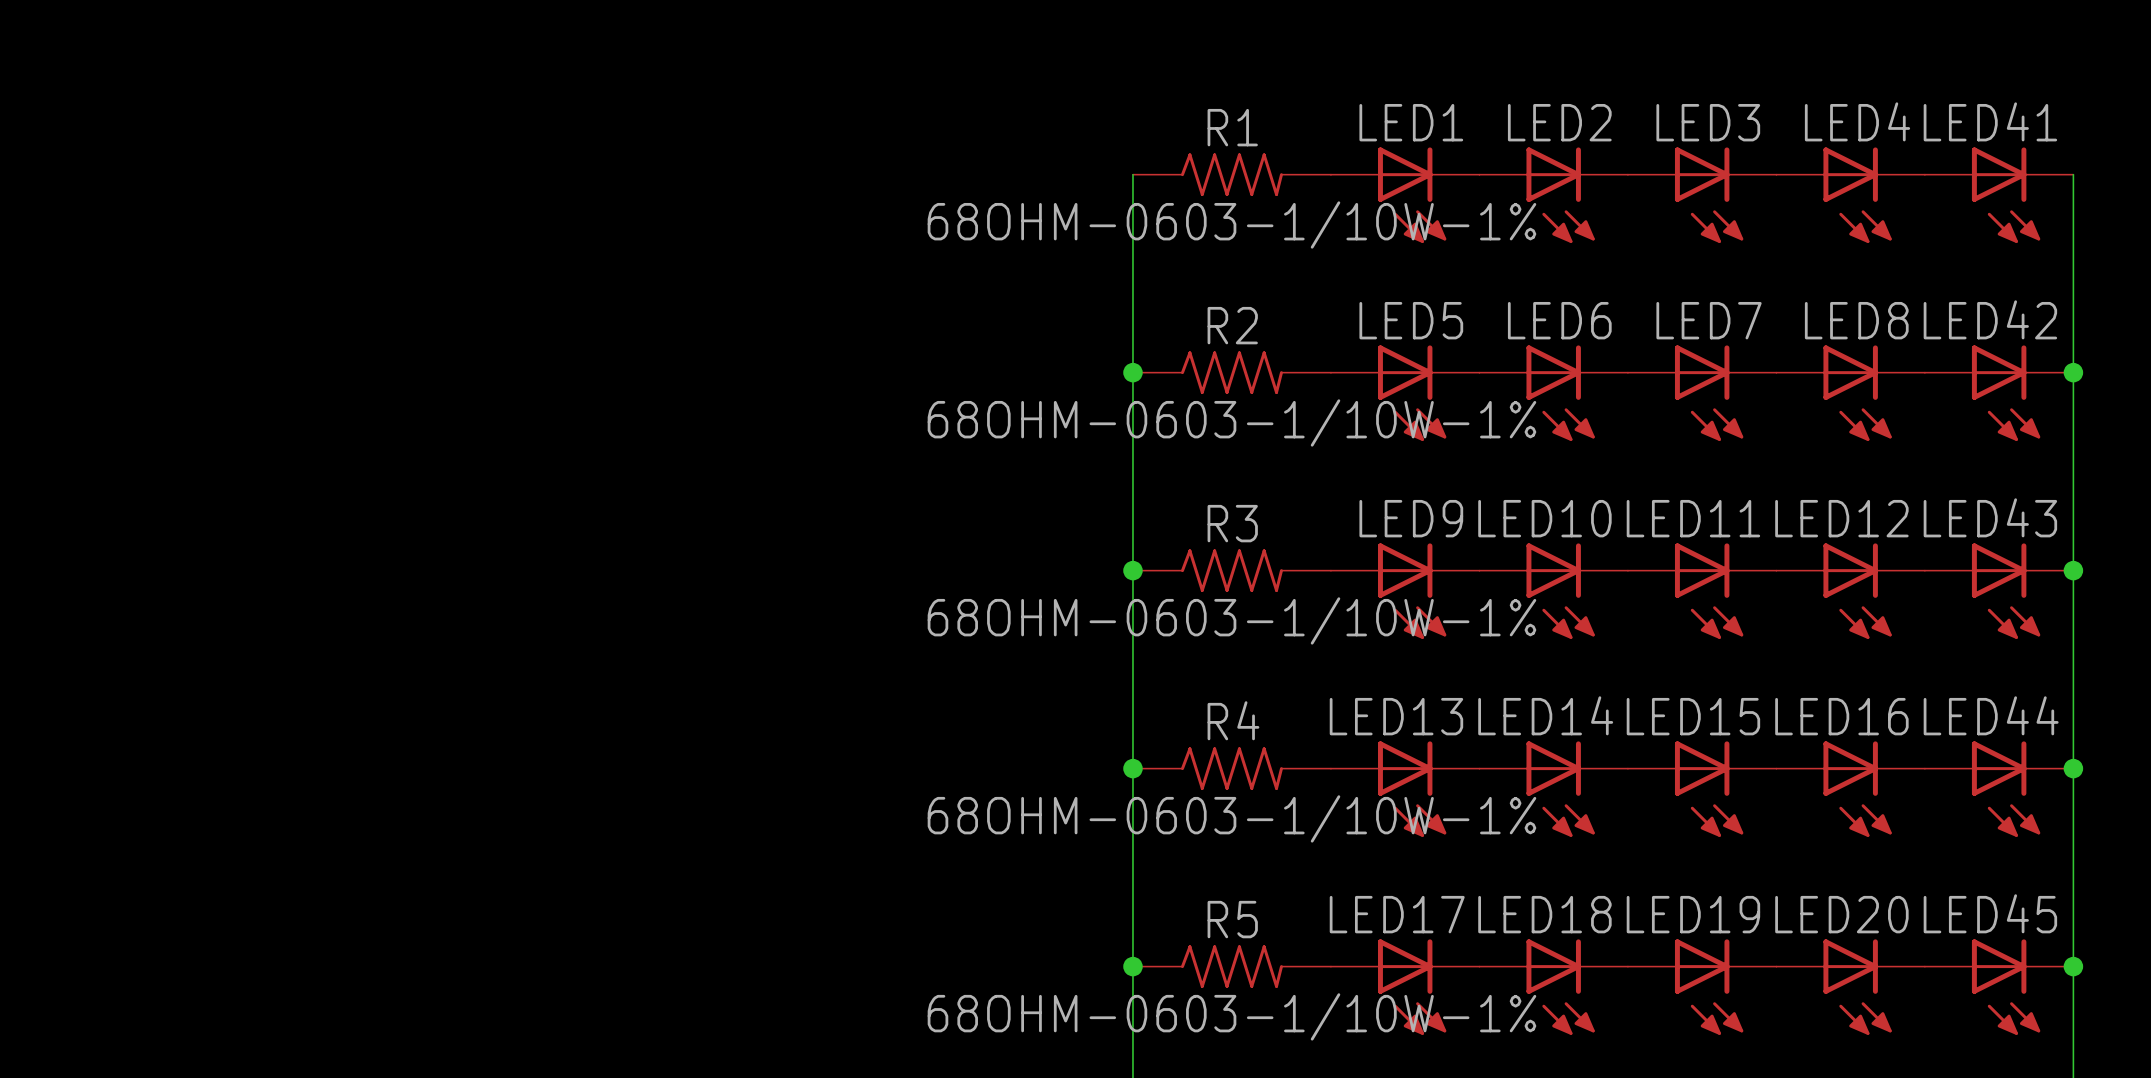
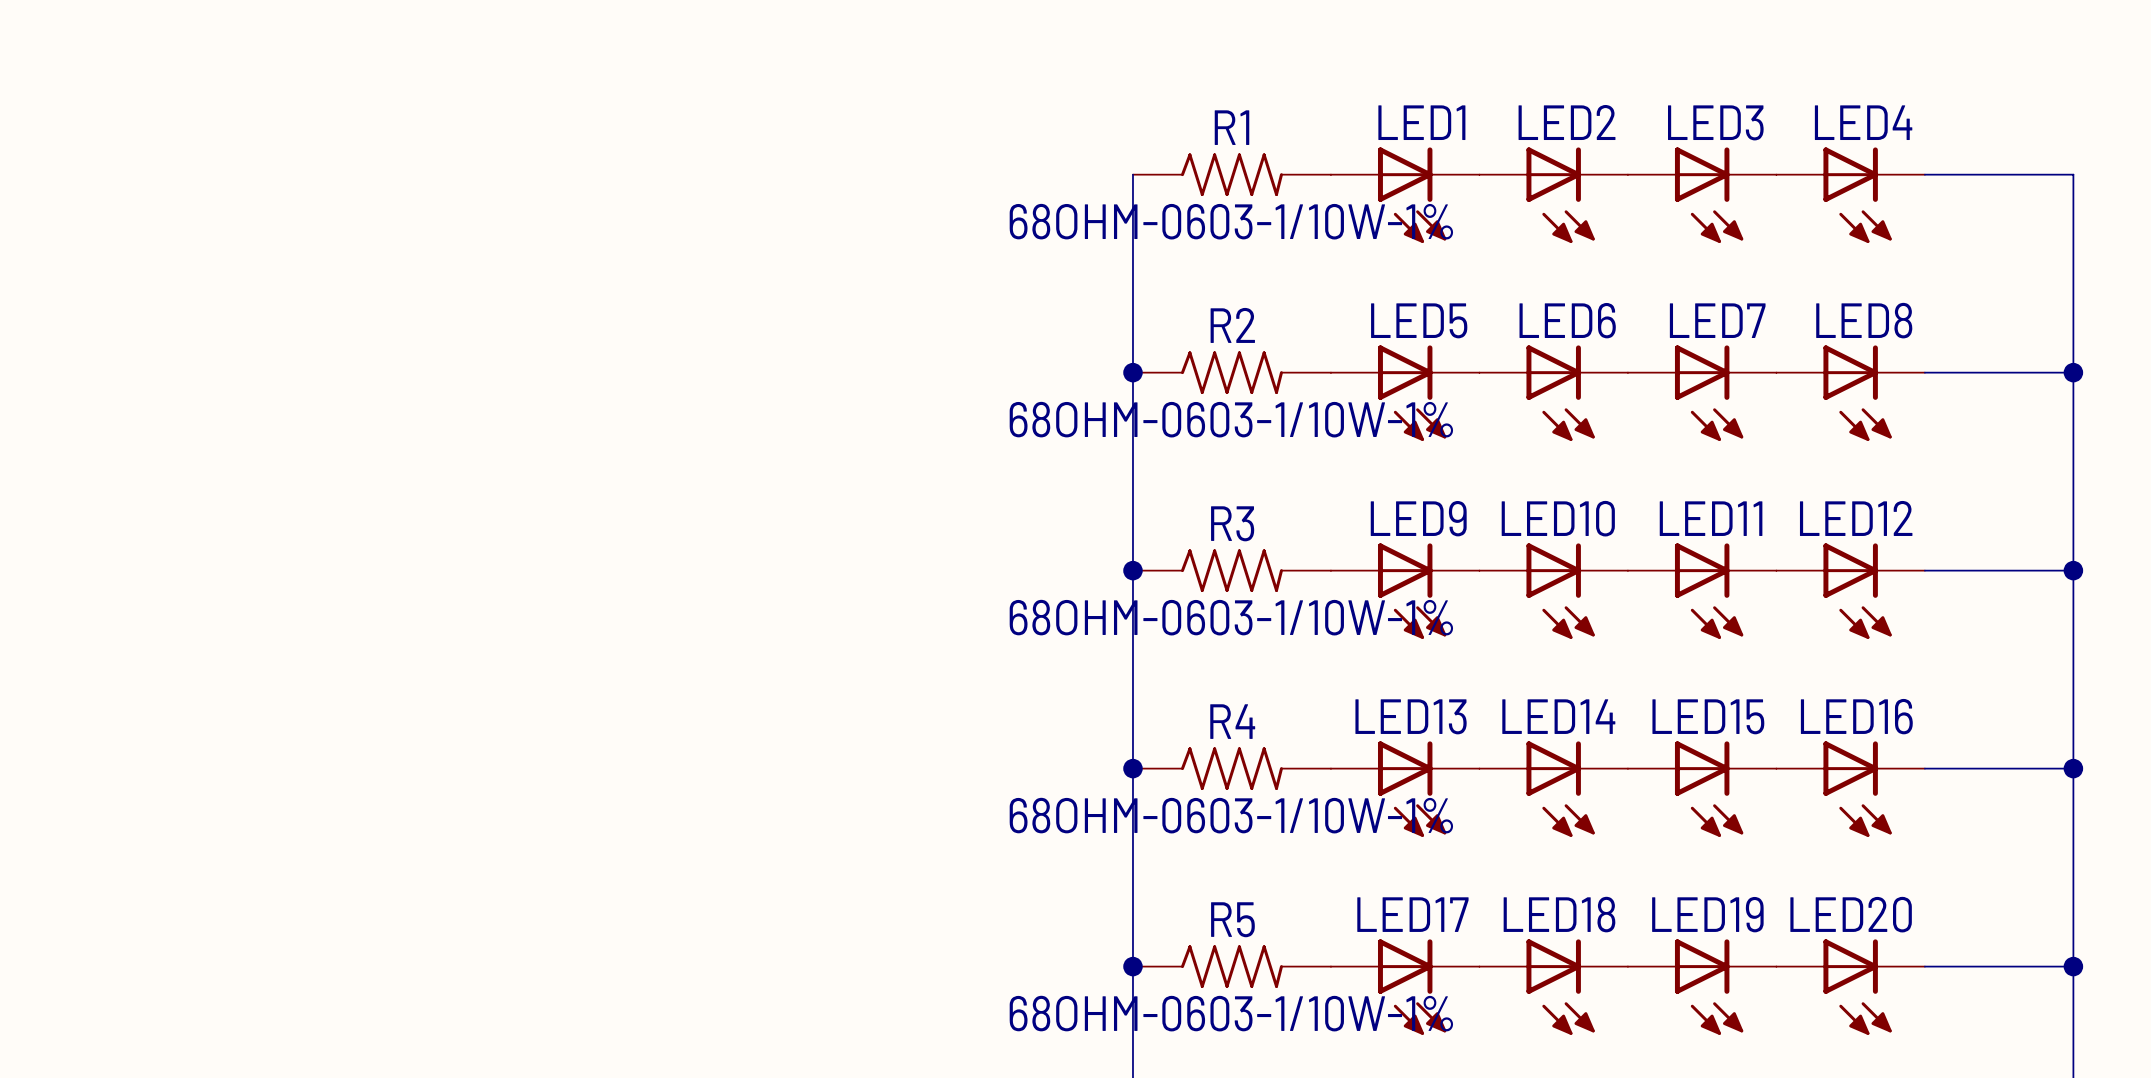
LED41: (1999, 195) -> none
LED42: (1999, 393) -> none
LED43: (1999, 591) -> none
LED44: (1999, 789) -> none
LED45: (1999, 987) -> none

